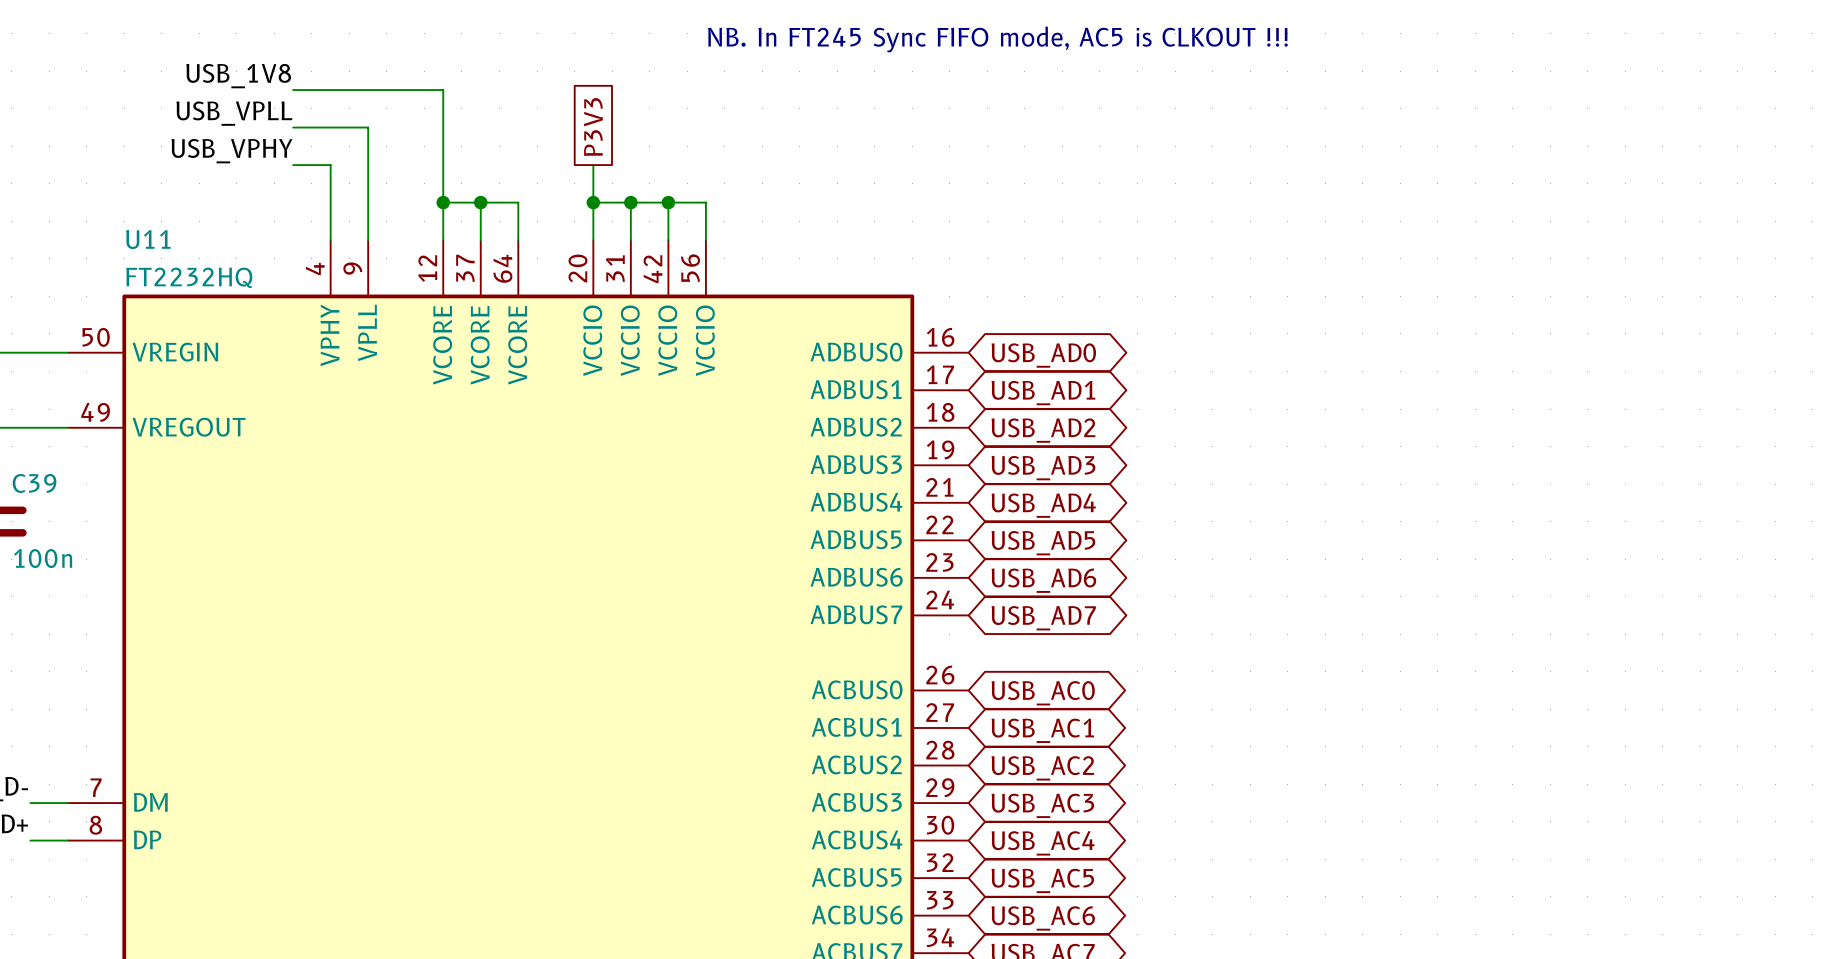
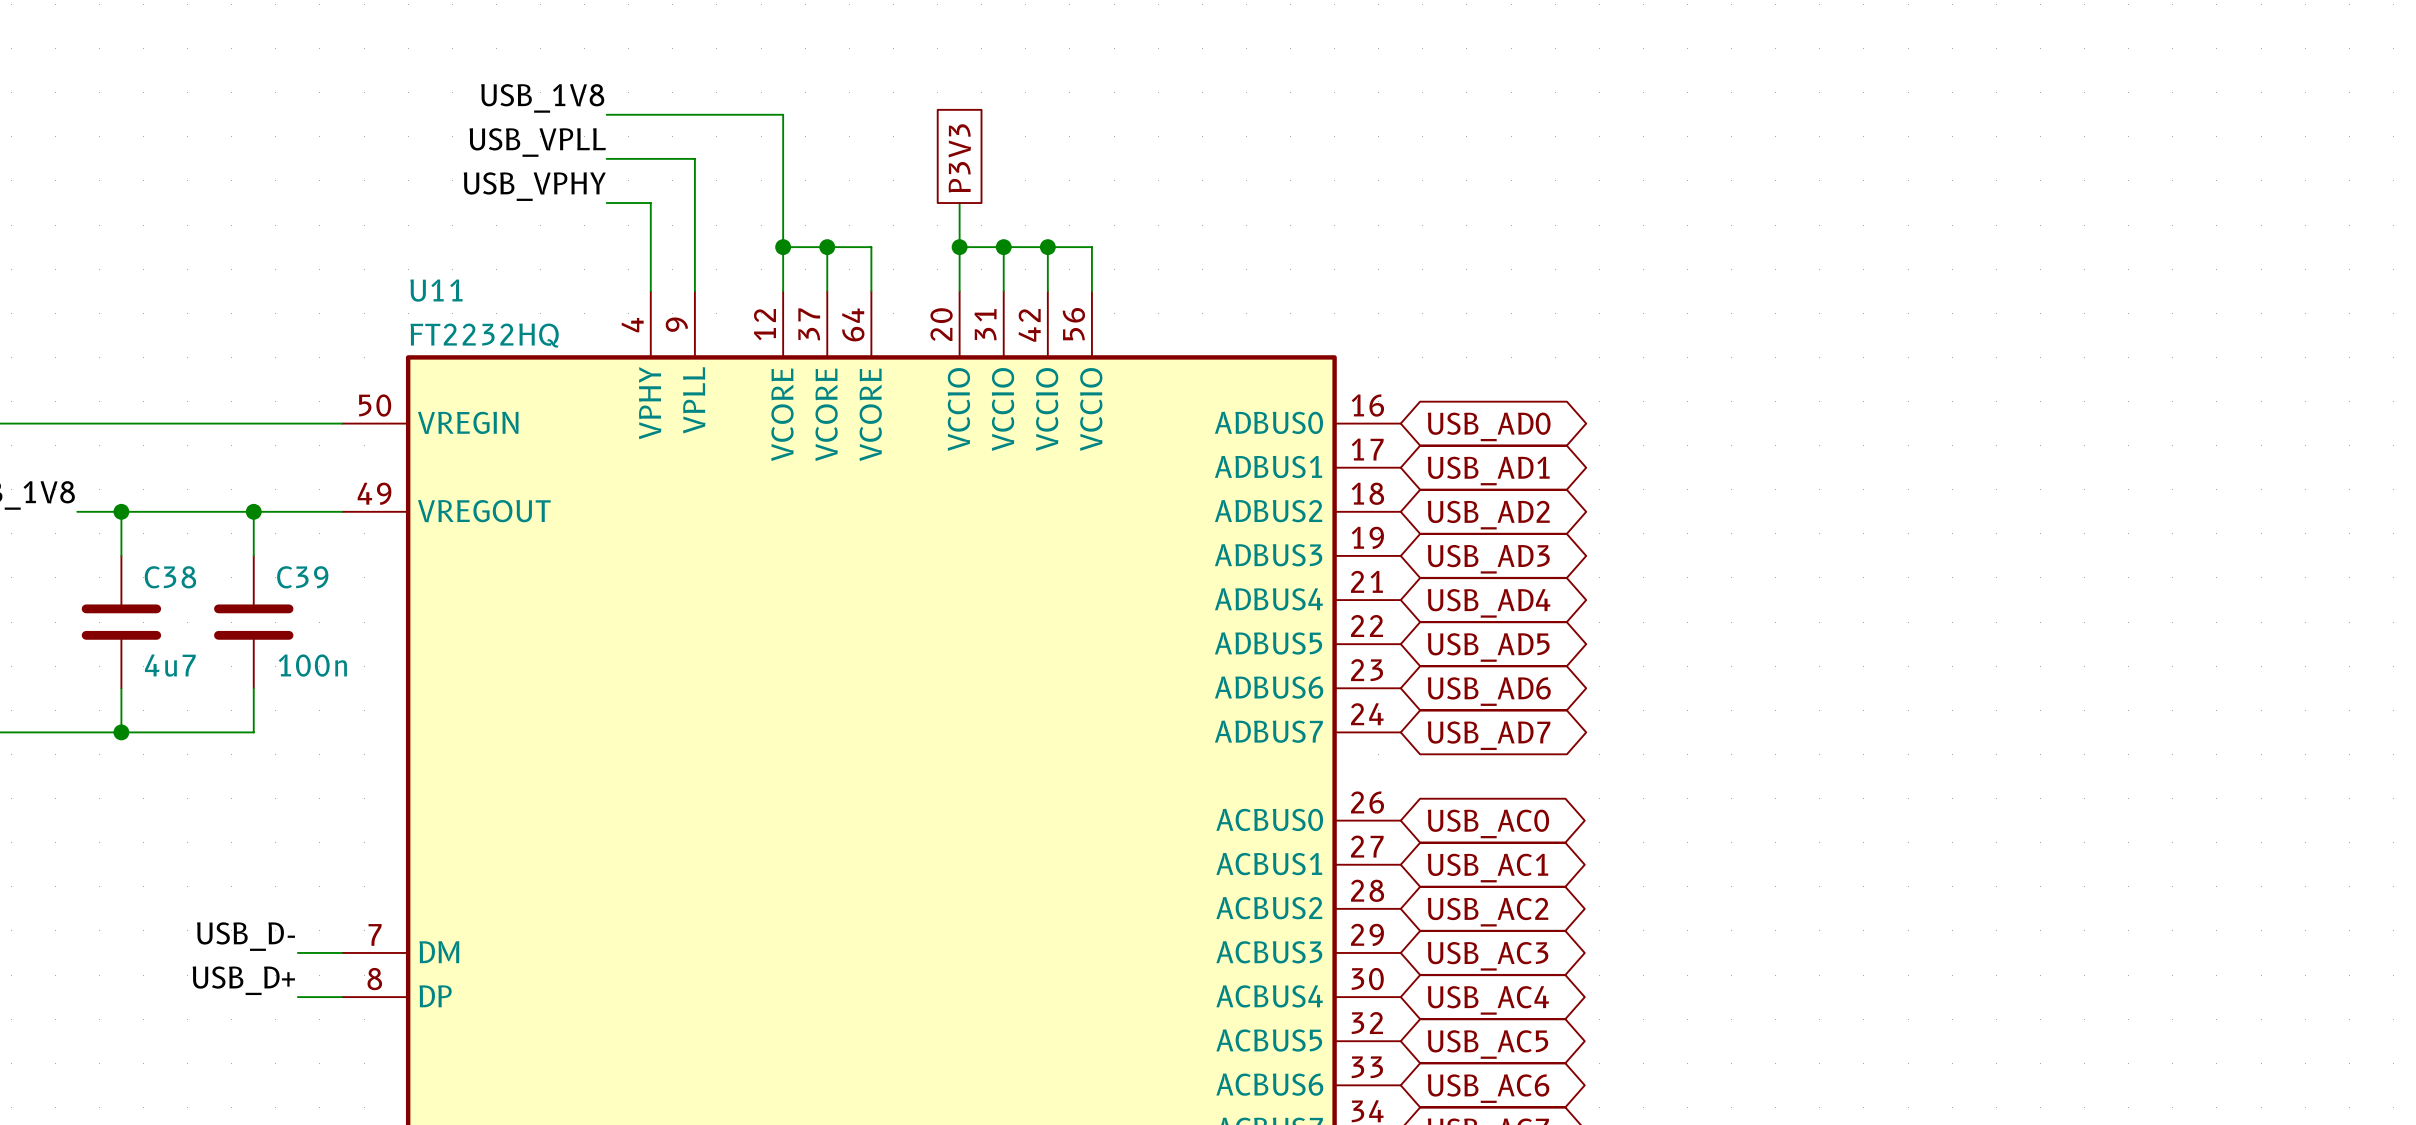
text: NB. In FT245 Sync FIFO mode, AC5 is CLKOUT !!! (997, 39) -> none

